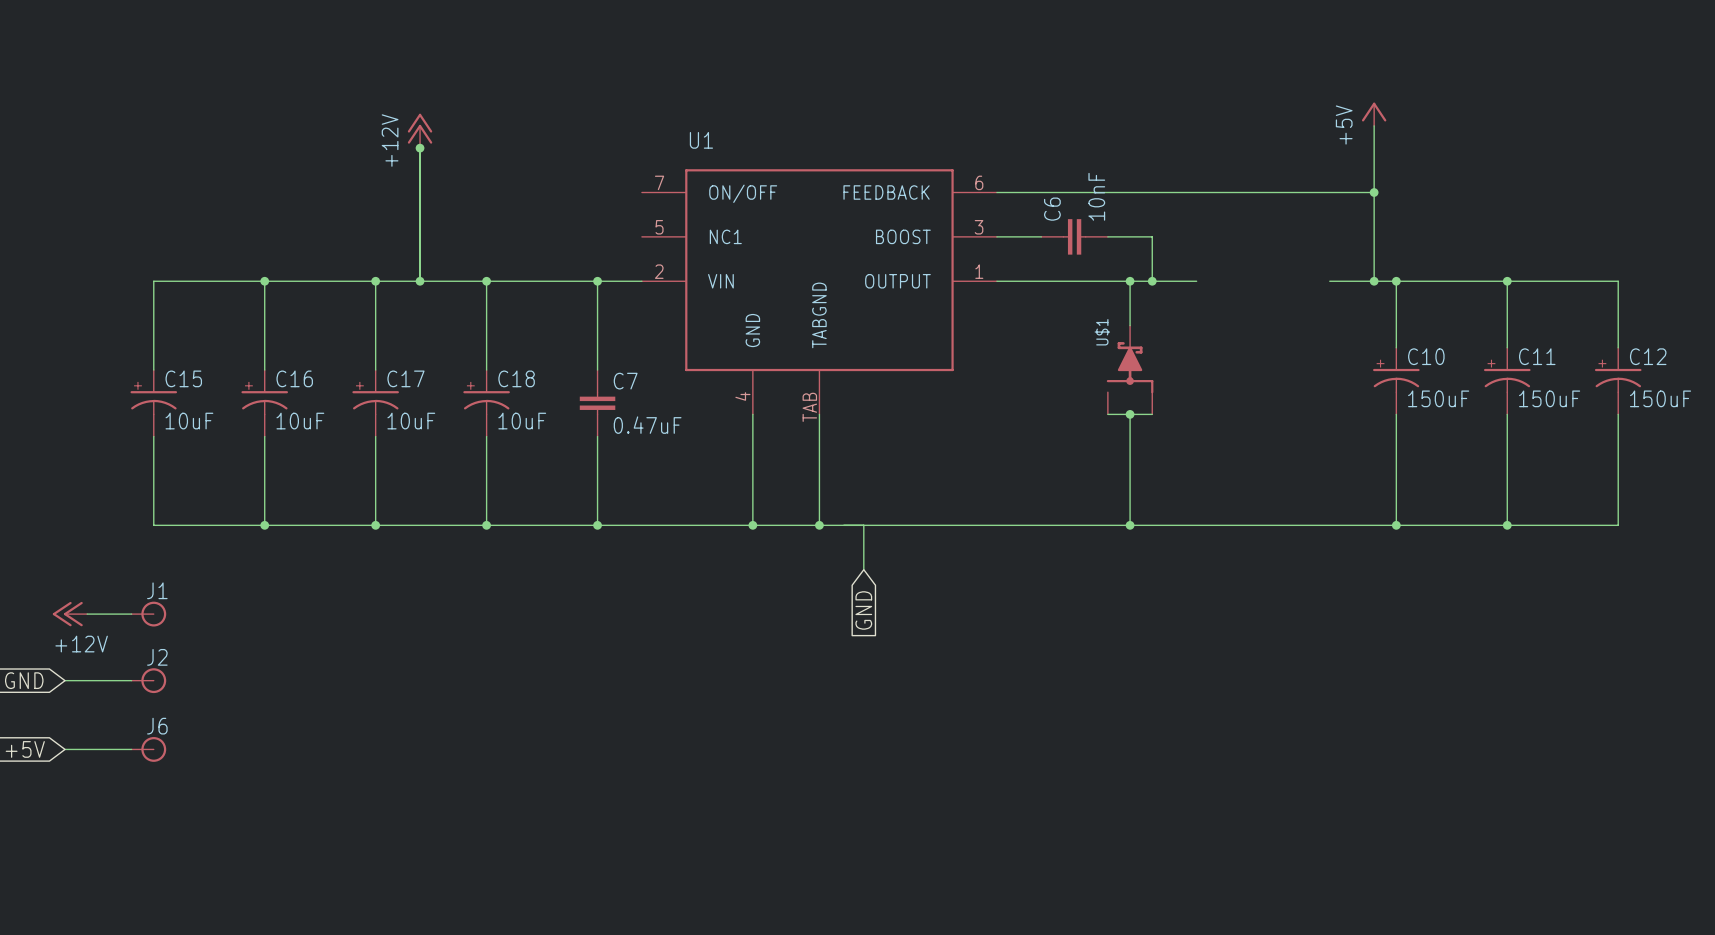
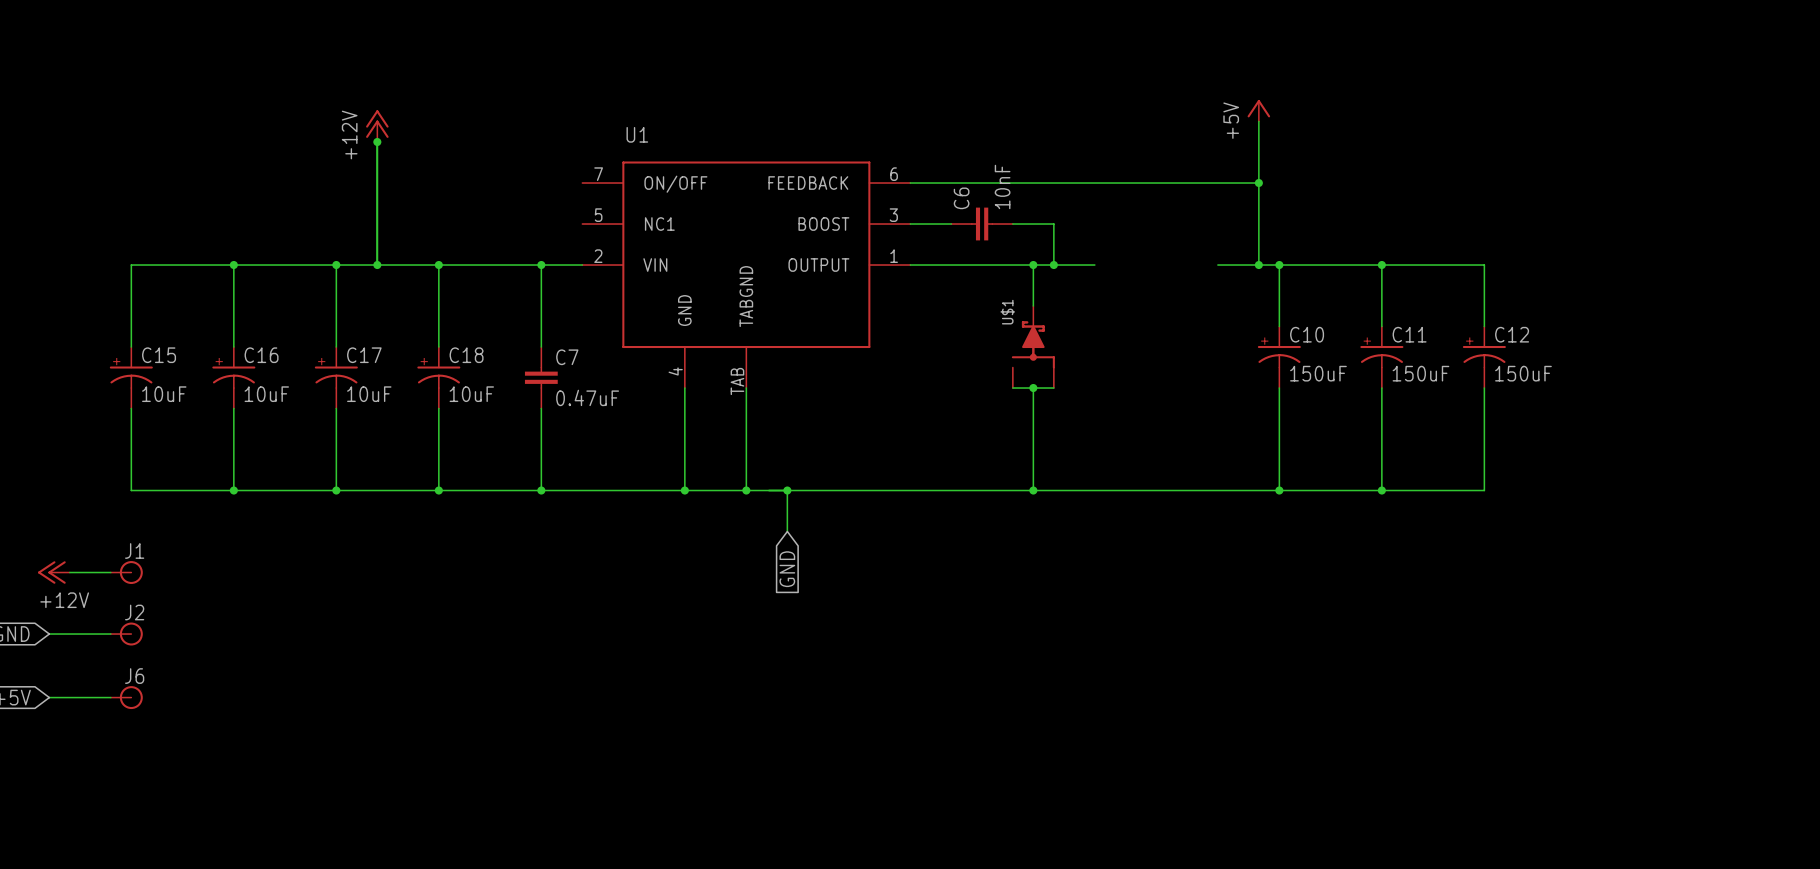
junction: none -> (787, 490)

